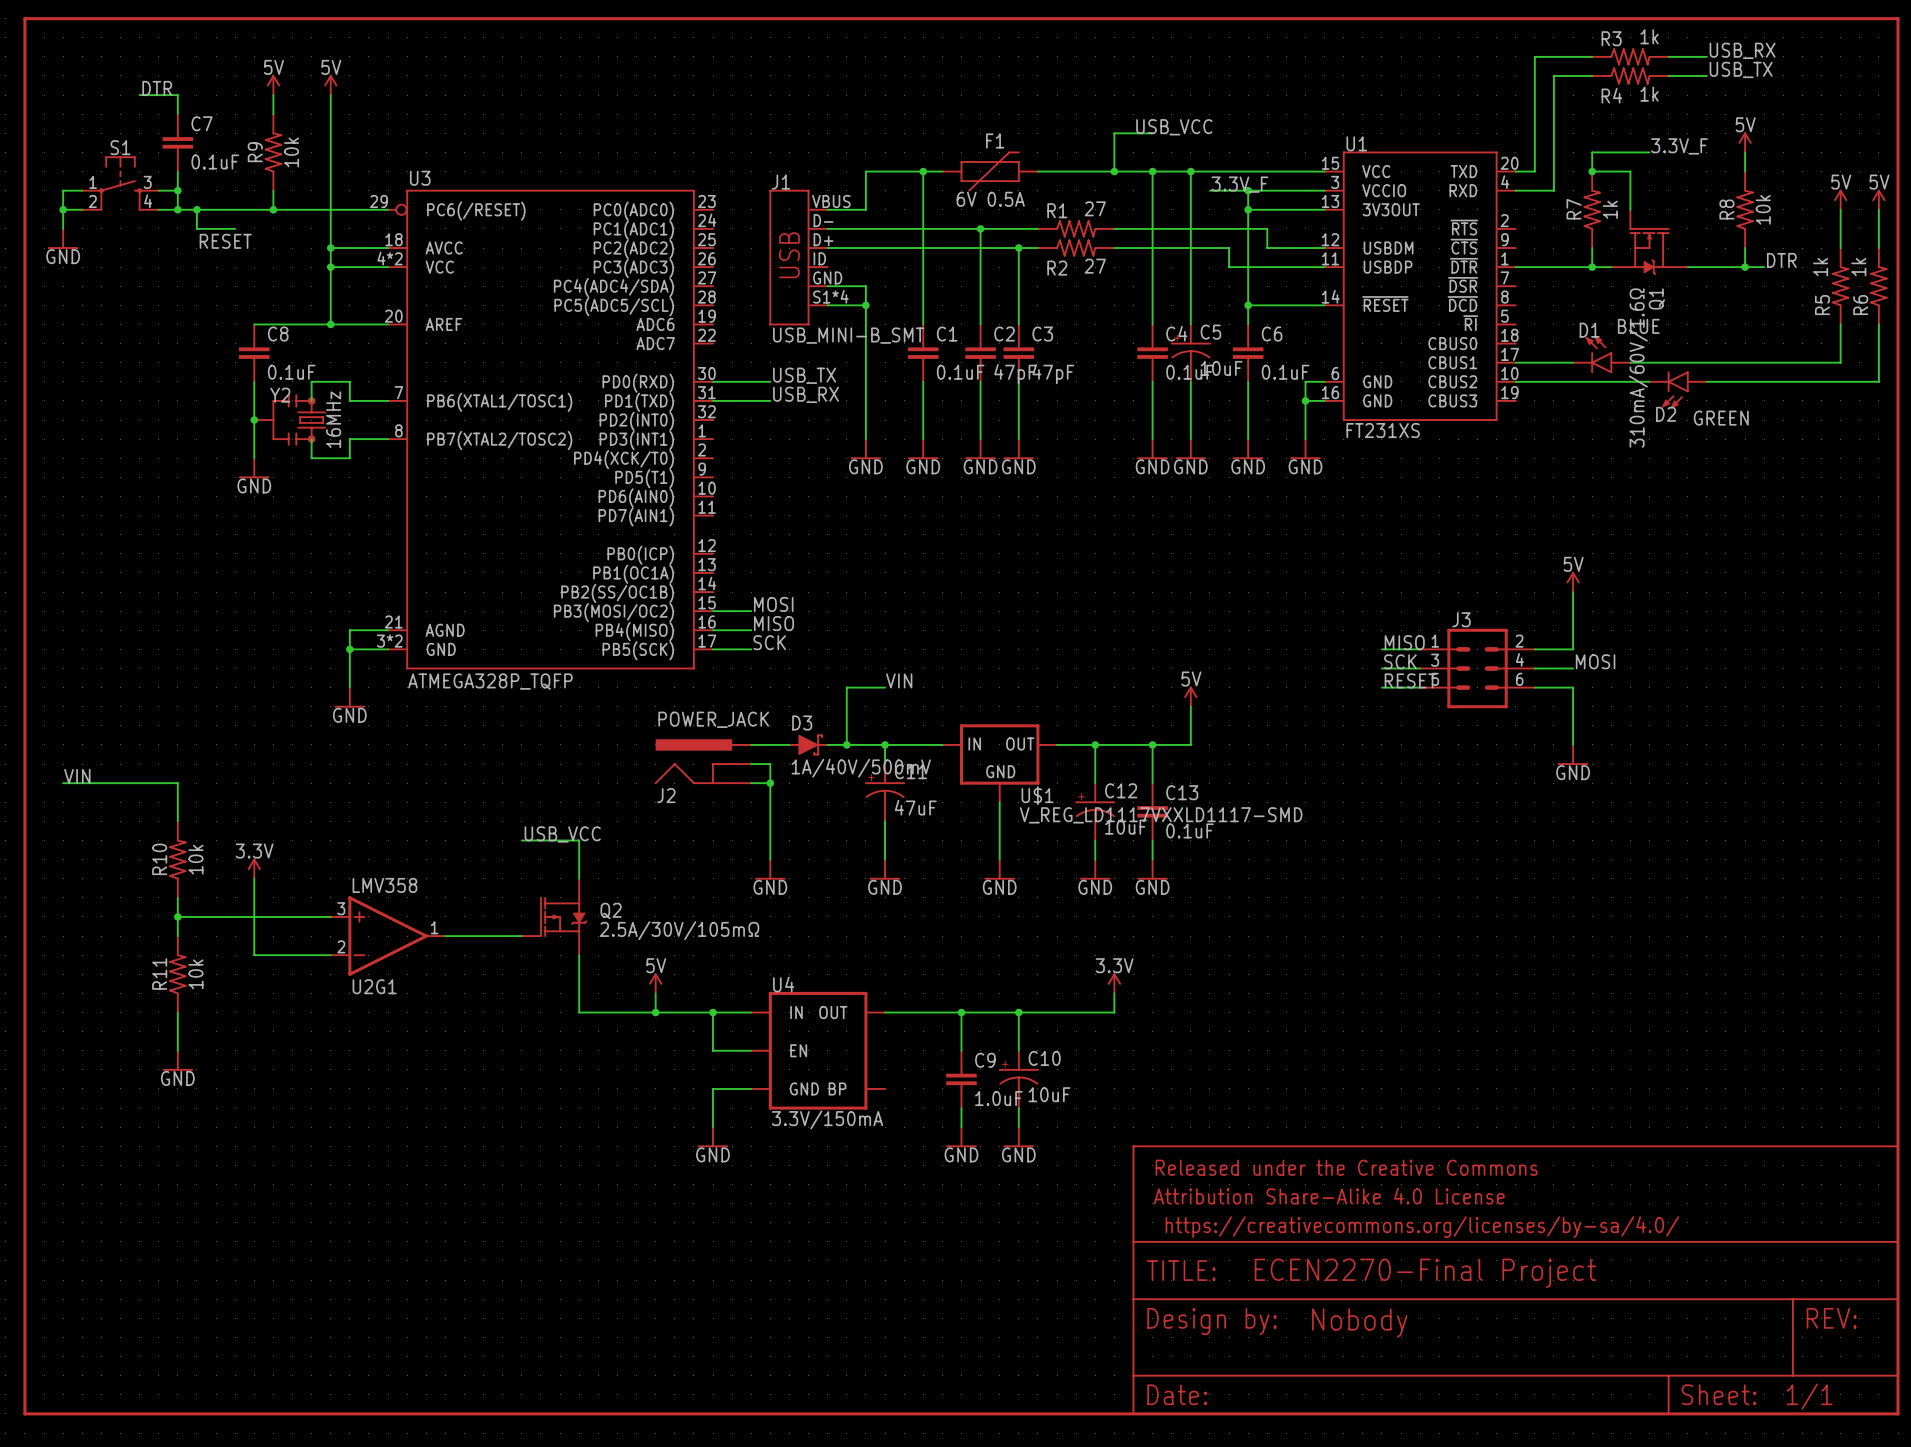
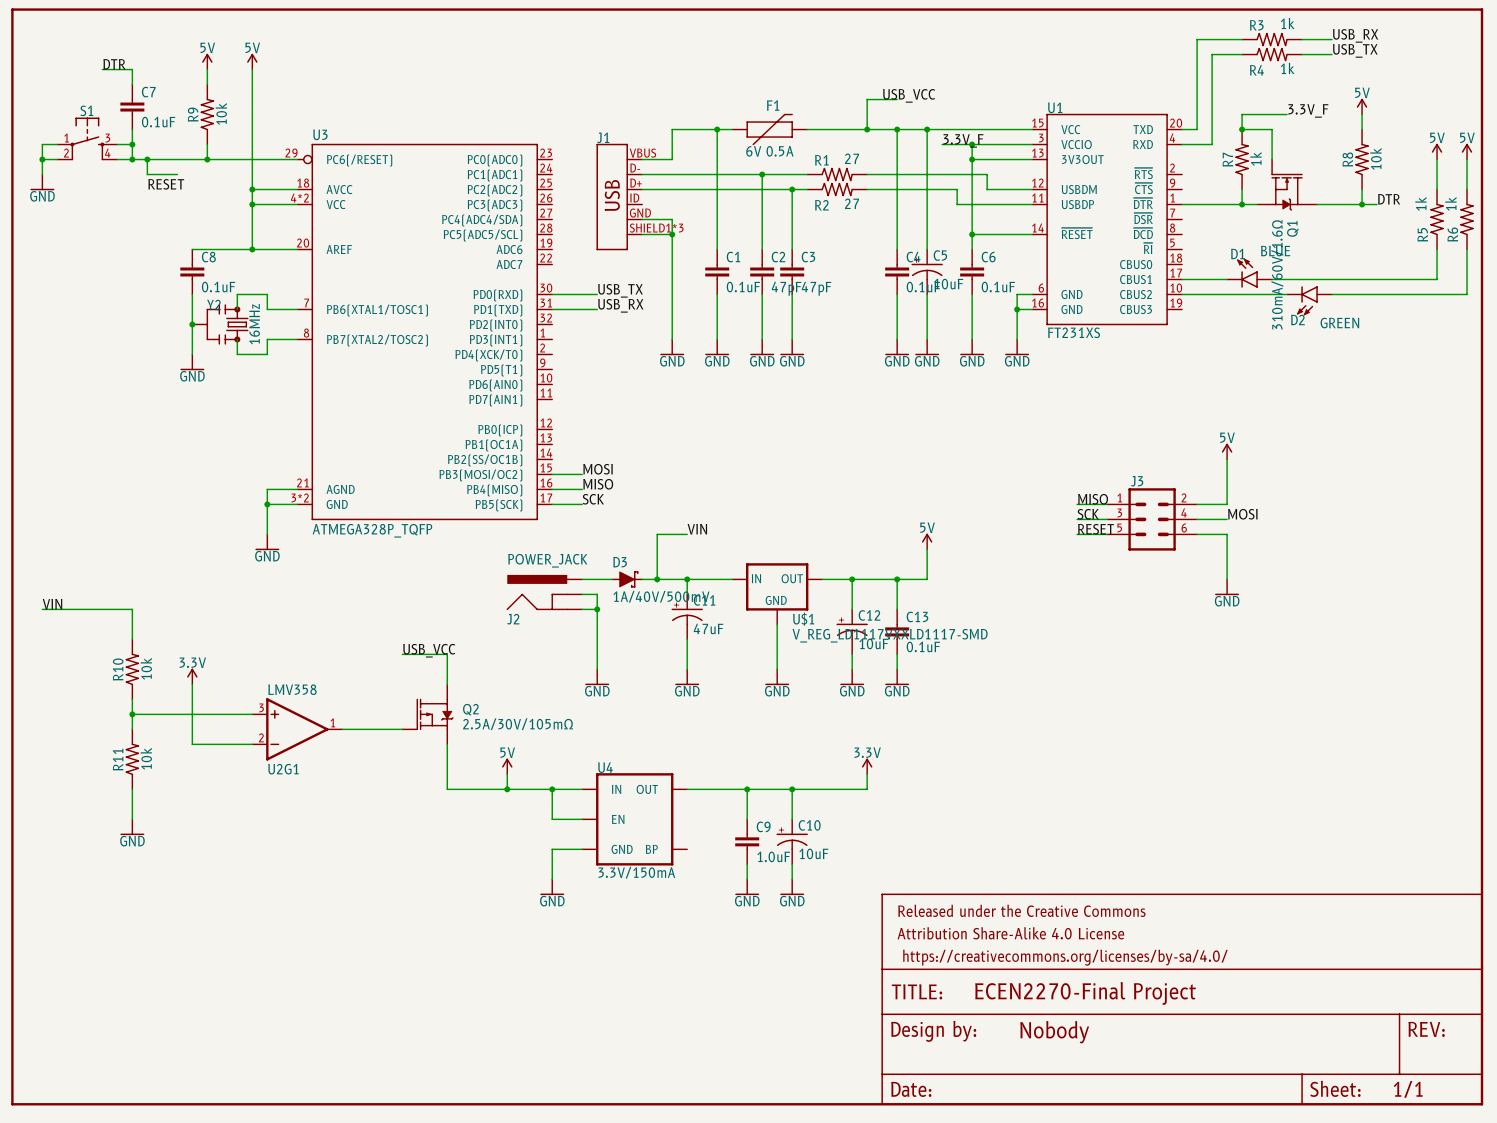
J1 pin number: S1*4 (830, 296) -> SHIELD1*3 (656, 228)
J1 value: USB_MINI-B_SMT (848, 335) -> none

